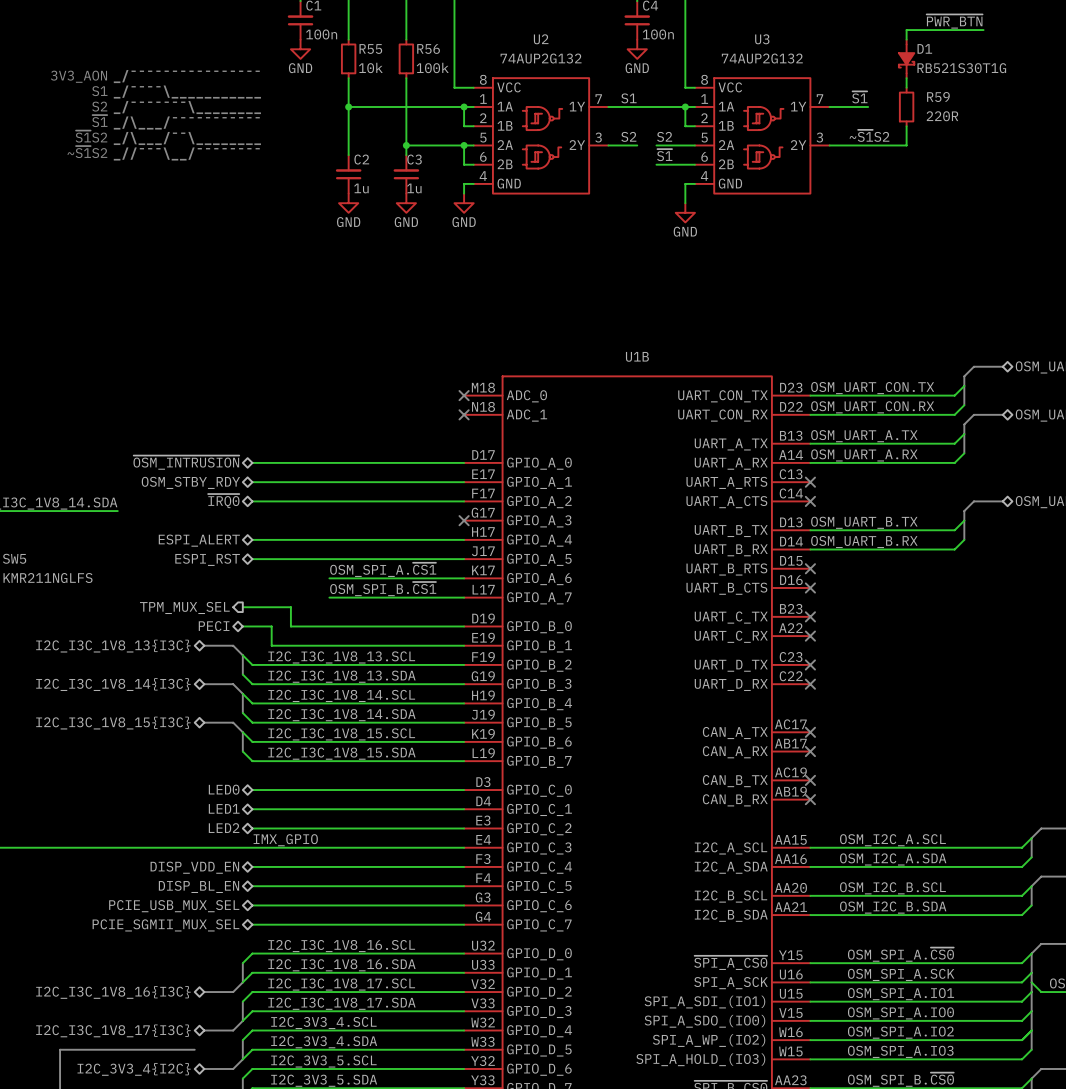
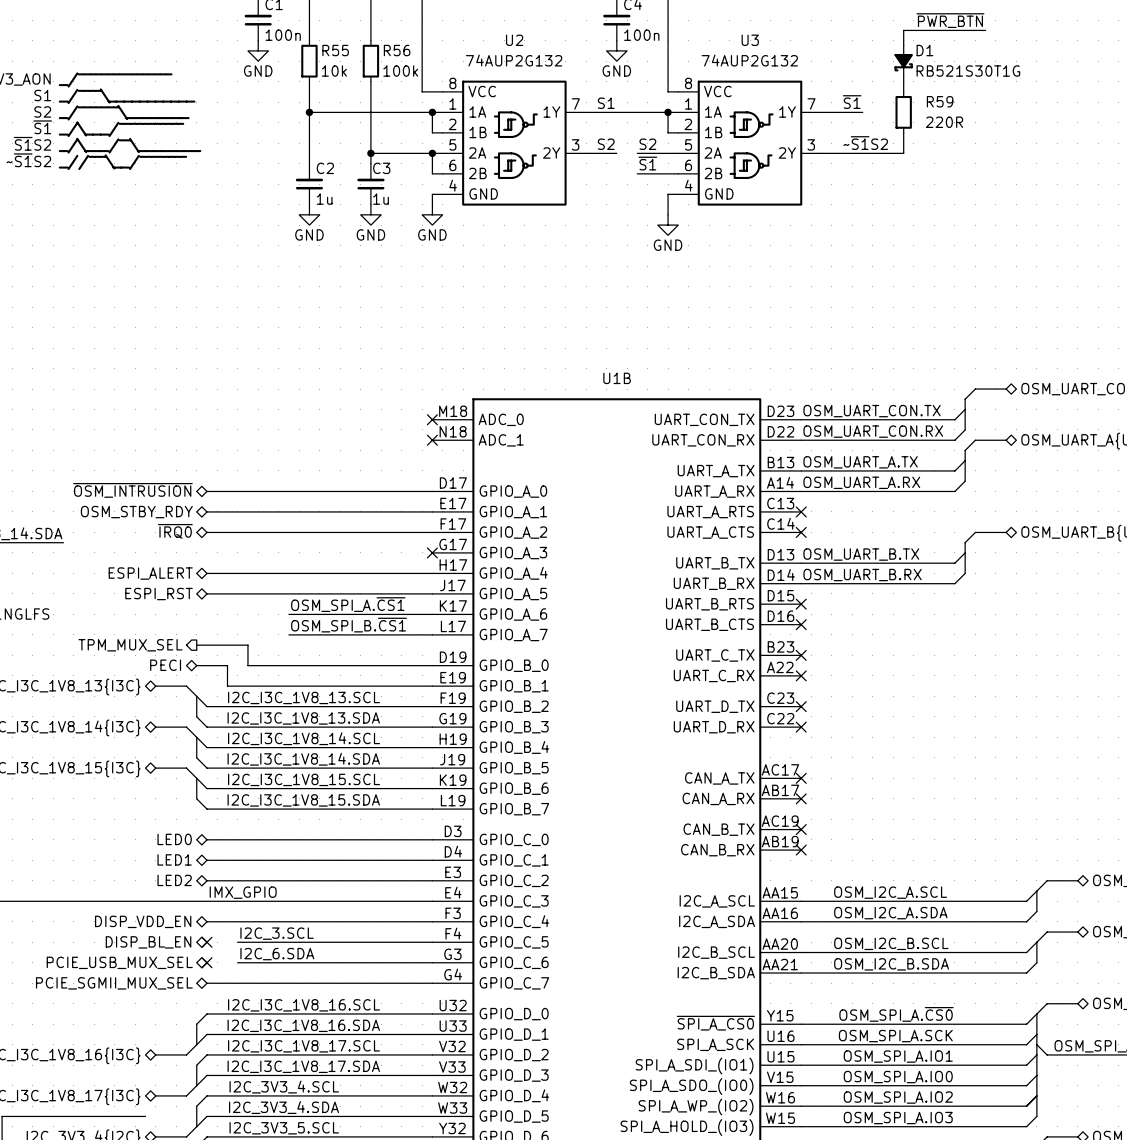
label: none -> I2C_3.SCL (277, 933)
wire: (252, 886) (281, 886) -> none
no-connect mark: none -> (206, 942)
label: none -> I2C_6.SDA (277, 954)
wire: (252, 905) (281, 905) -> none
no-connect mark: none -> (206, 962)

